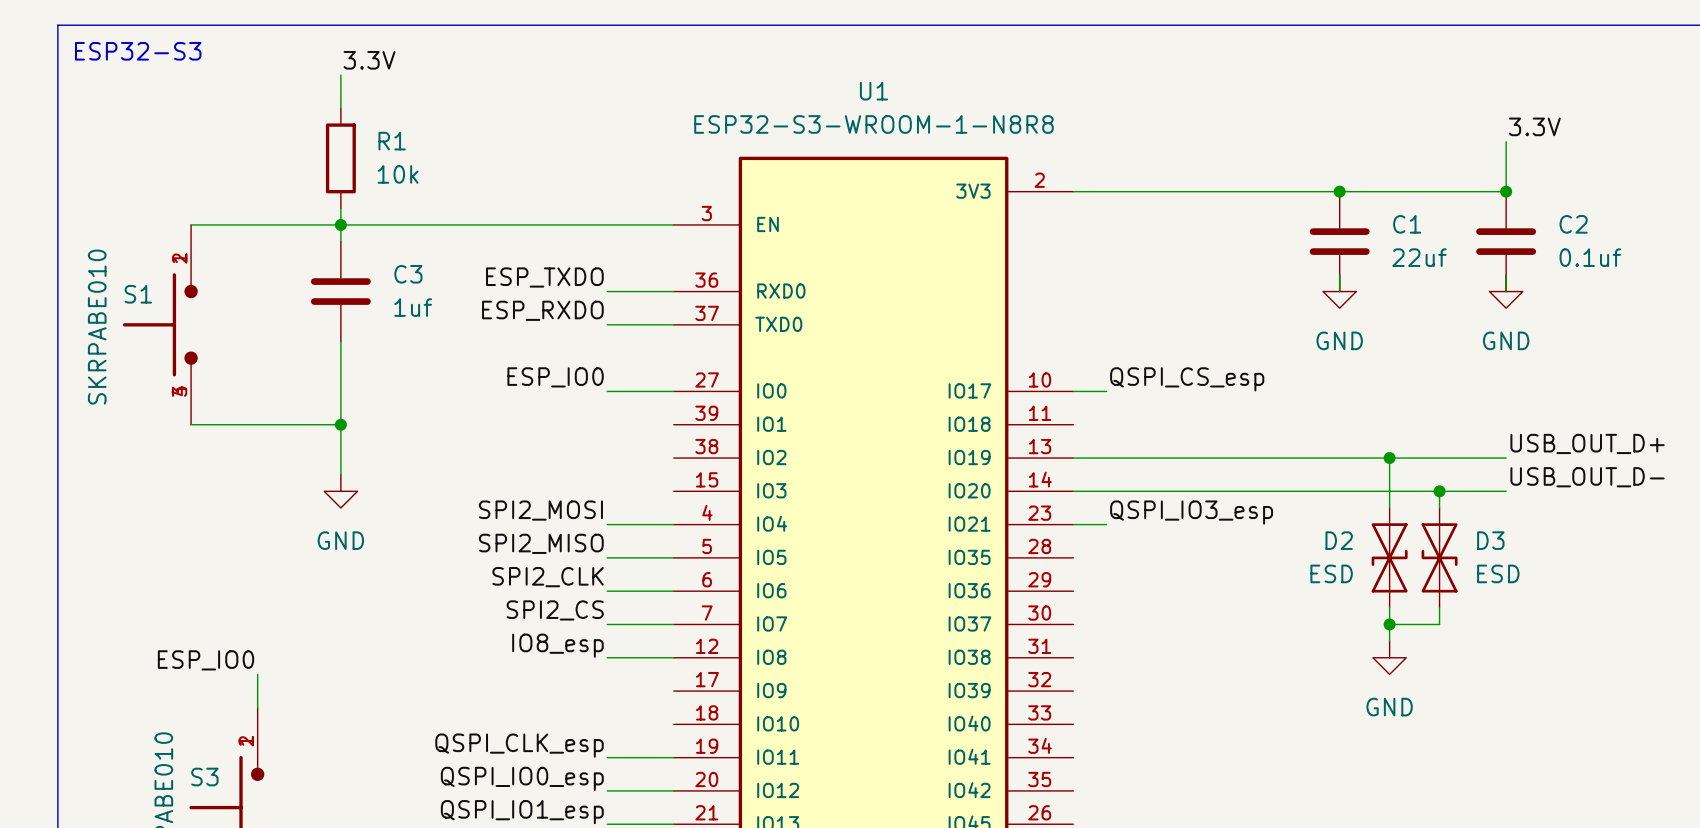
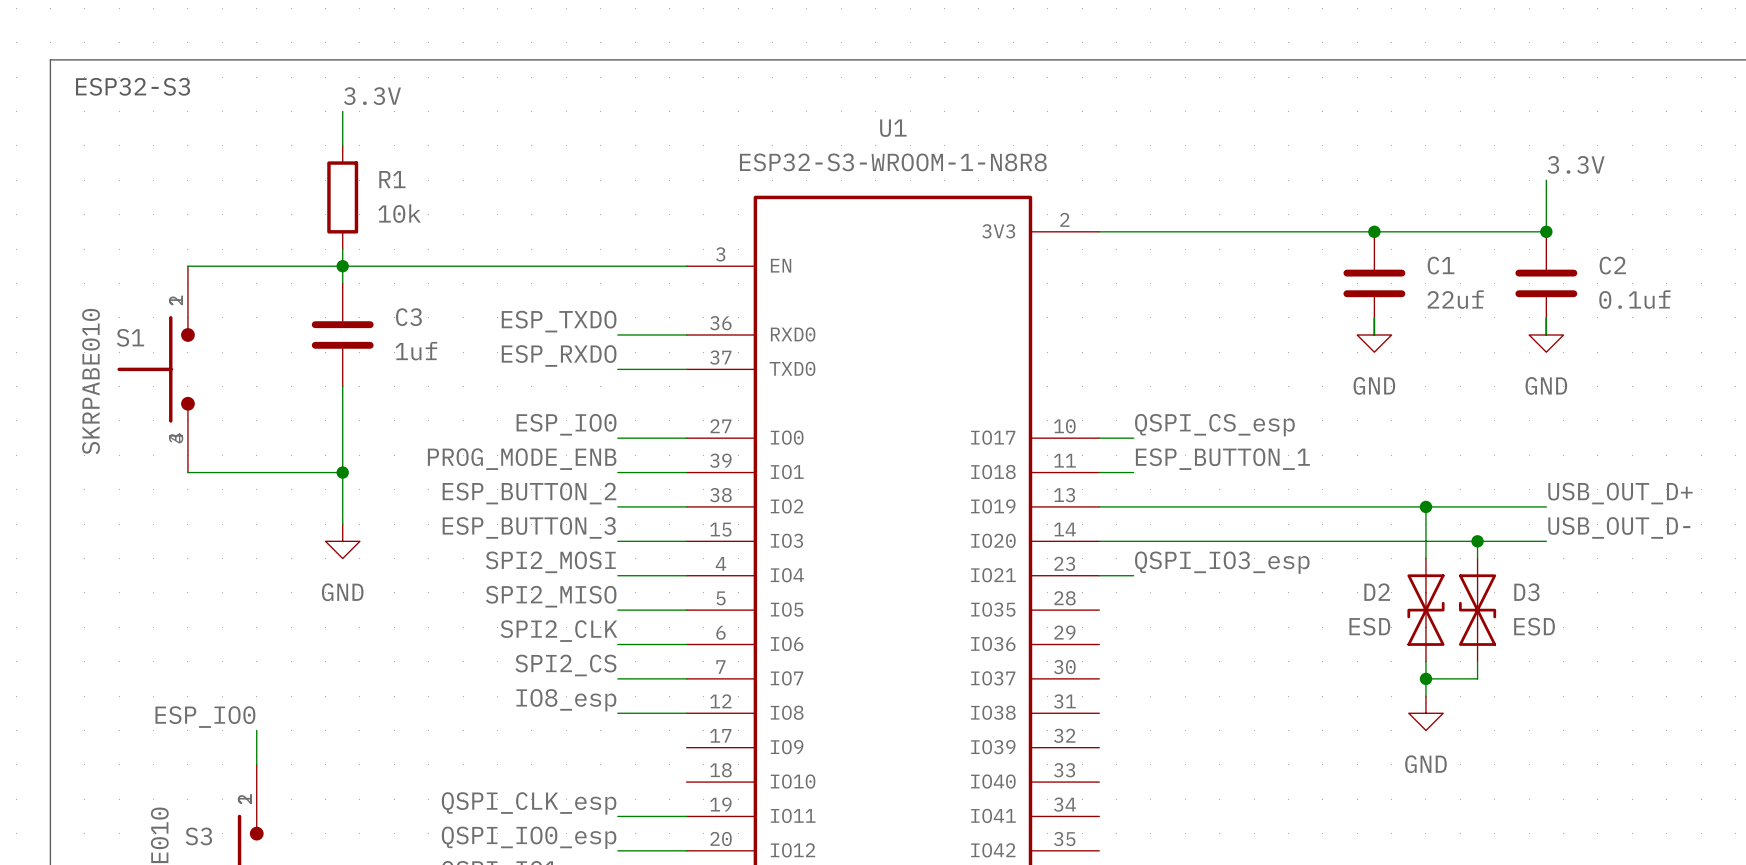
label: none -> PROG_MODE_ENB (522, 459)
label: none -> ESP_BUTTON_1 (1222, 459)
wire: none -> (617, 472) (686, 472)
wire: none -> (1099, 472) (1133, 472)
label: none -> ESP_BUTTON_2 (529, 493)
wire: none -> (617, 506) (686, 506)
label: none -> ESP_BUTTON_3 (529, 527)
wire: none -> (617, 541) (686, 541)

